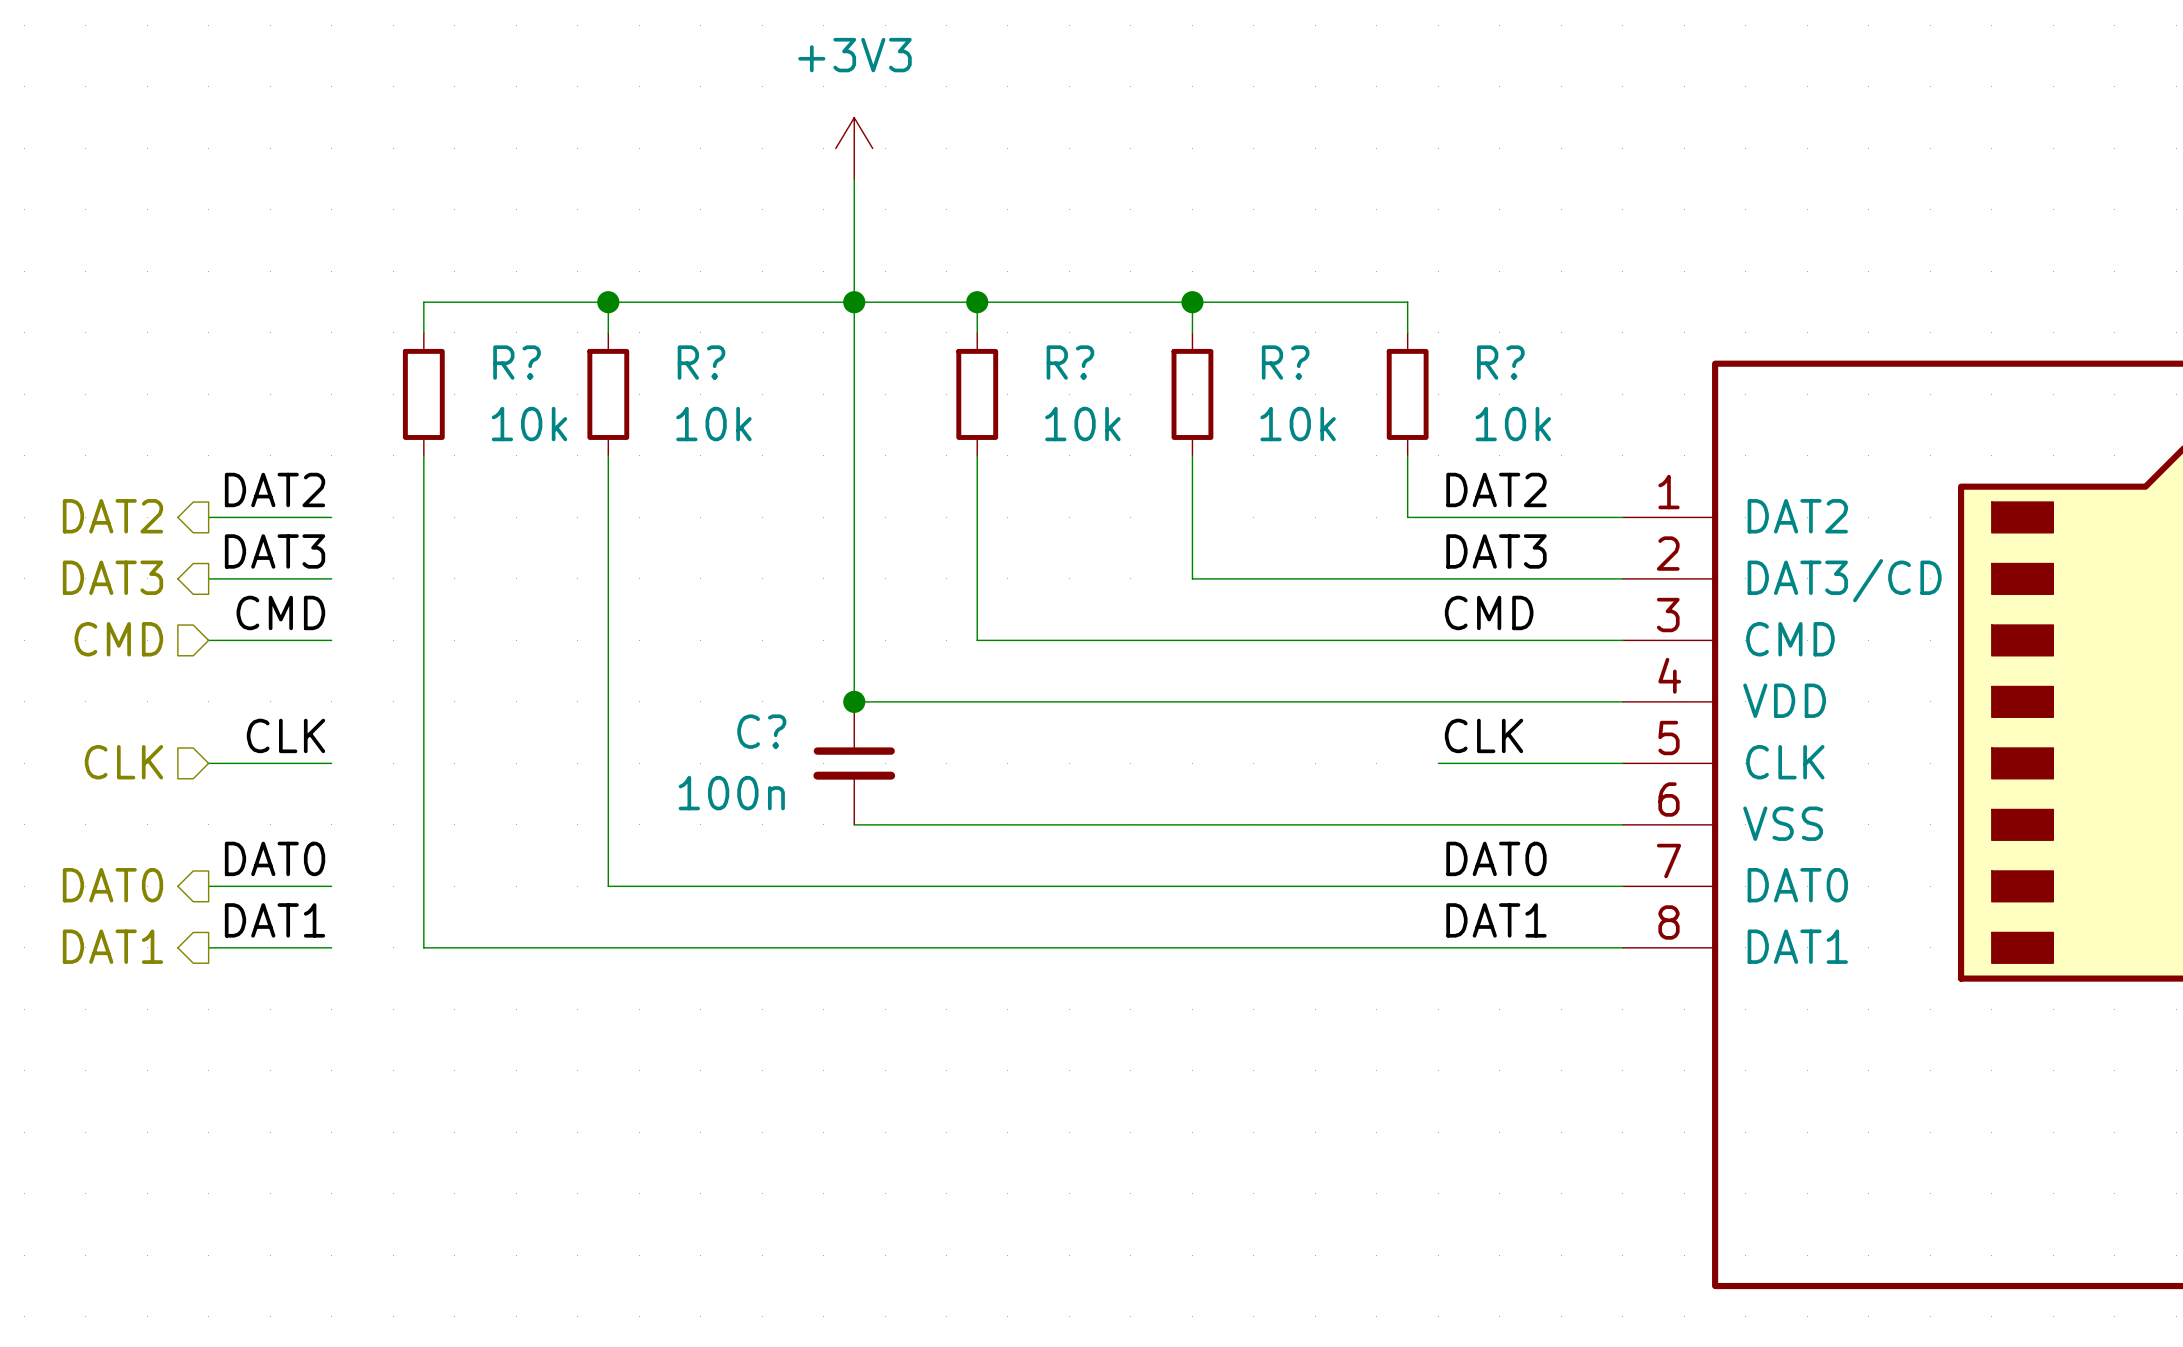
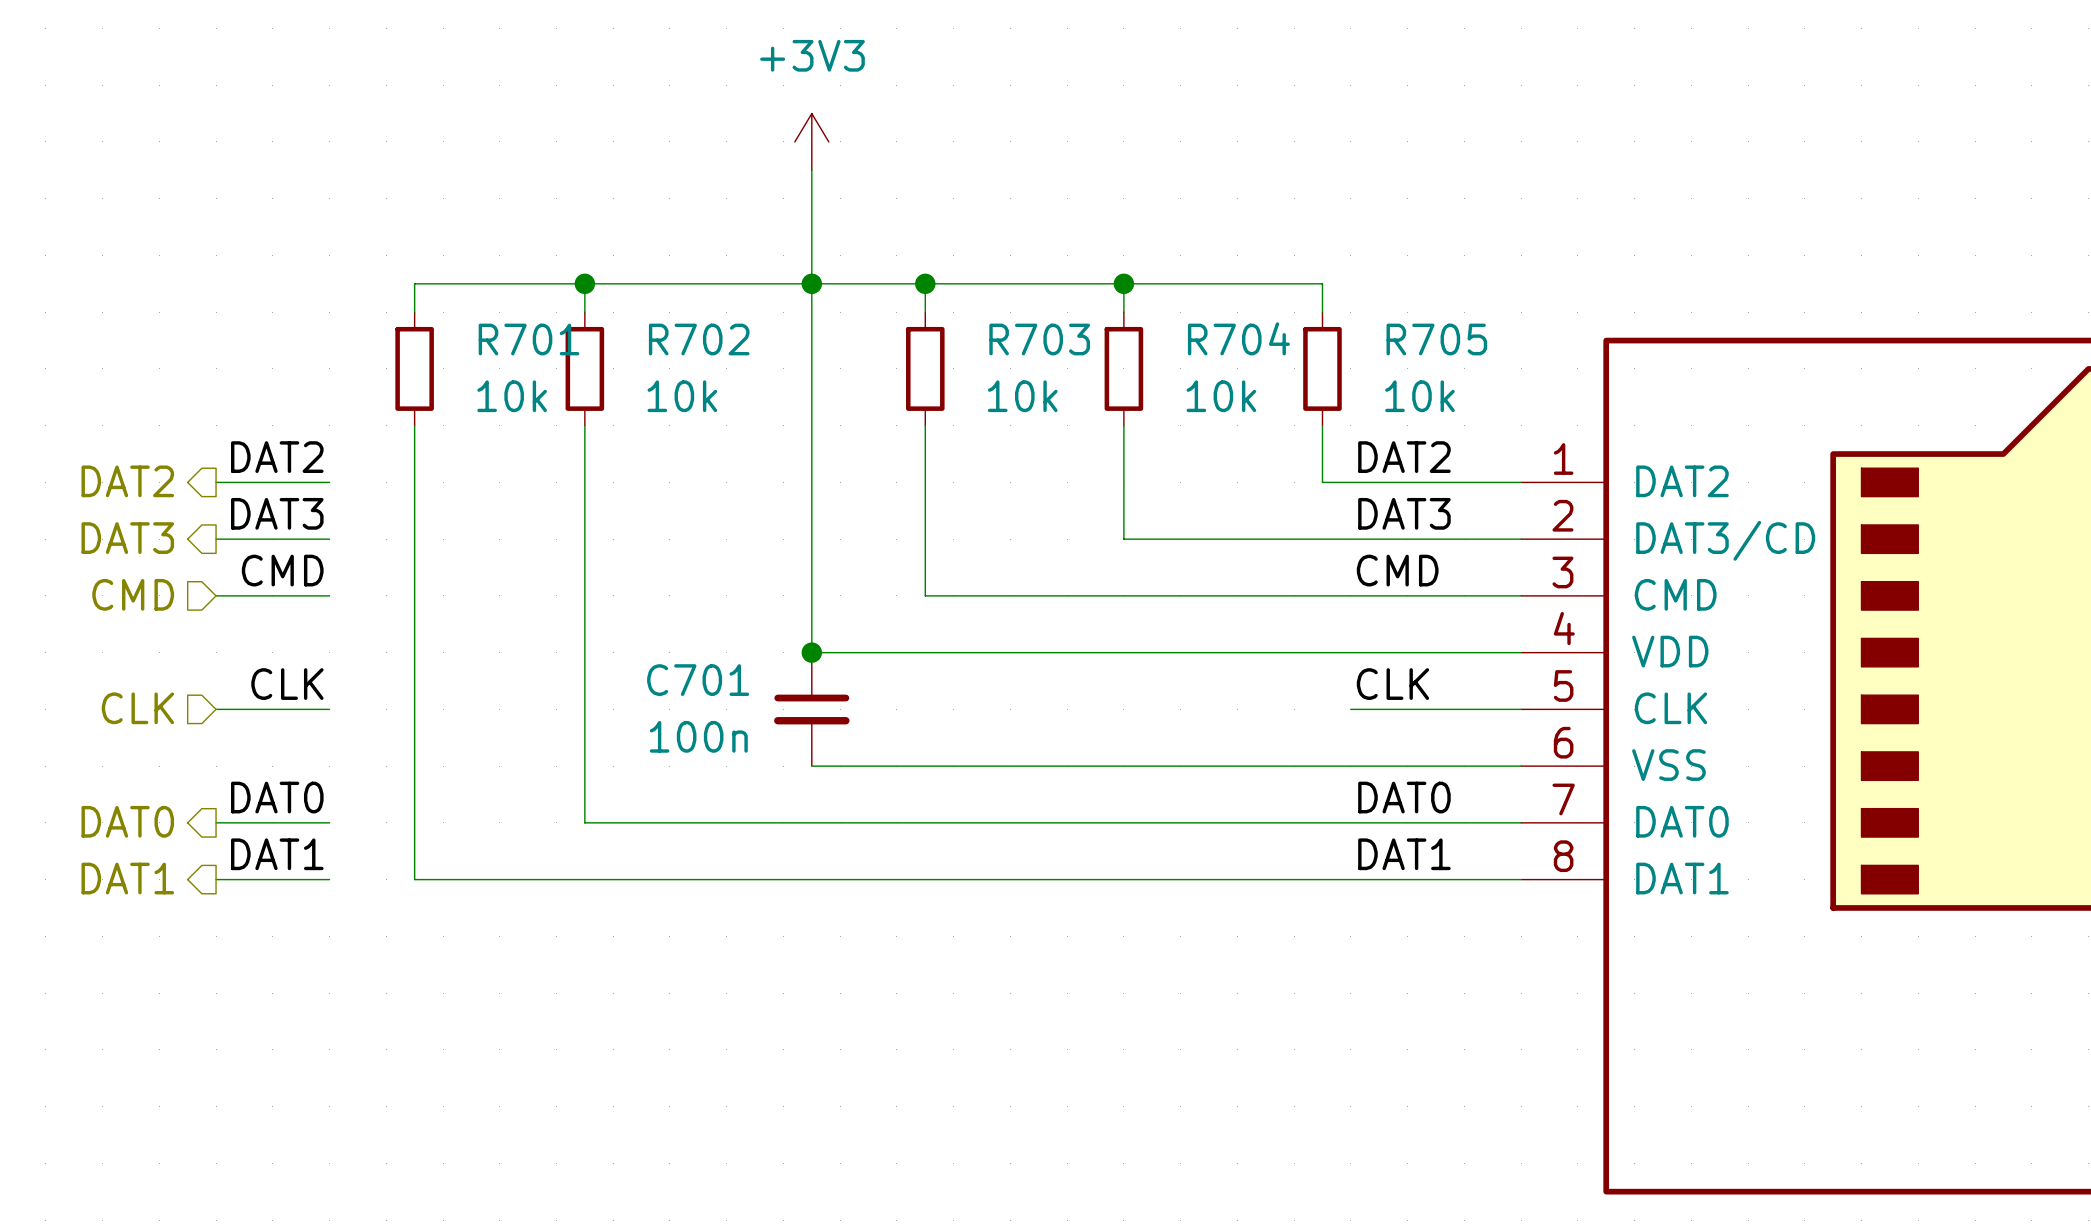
R? name: R? (517, 362) -> R701 (529, 339)
R? name: R? (701, 362) -> R702 (699, 339)
R? name: R? (1070, 362) -> R703 (1039, 339)
R? name: R? (1285, 362) -> R704 (1238, 338)
R? name: R? (1500, 362) -> R705 (1436, 339)
C? name: C? (761, 731) -> C701 (698, 680)

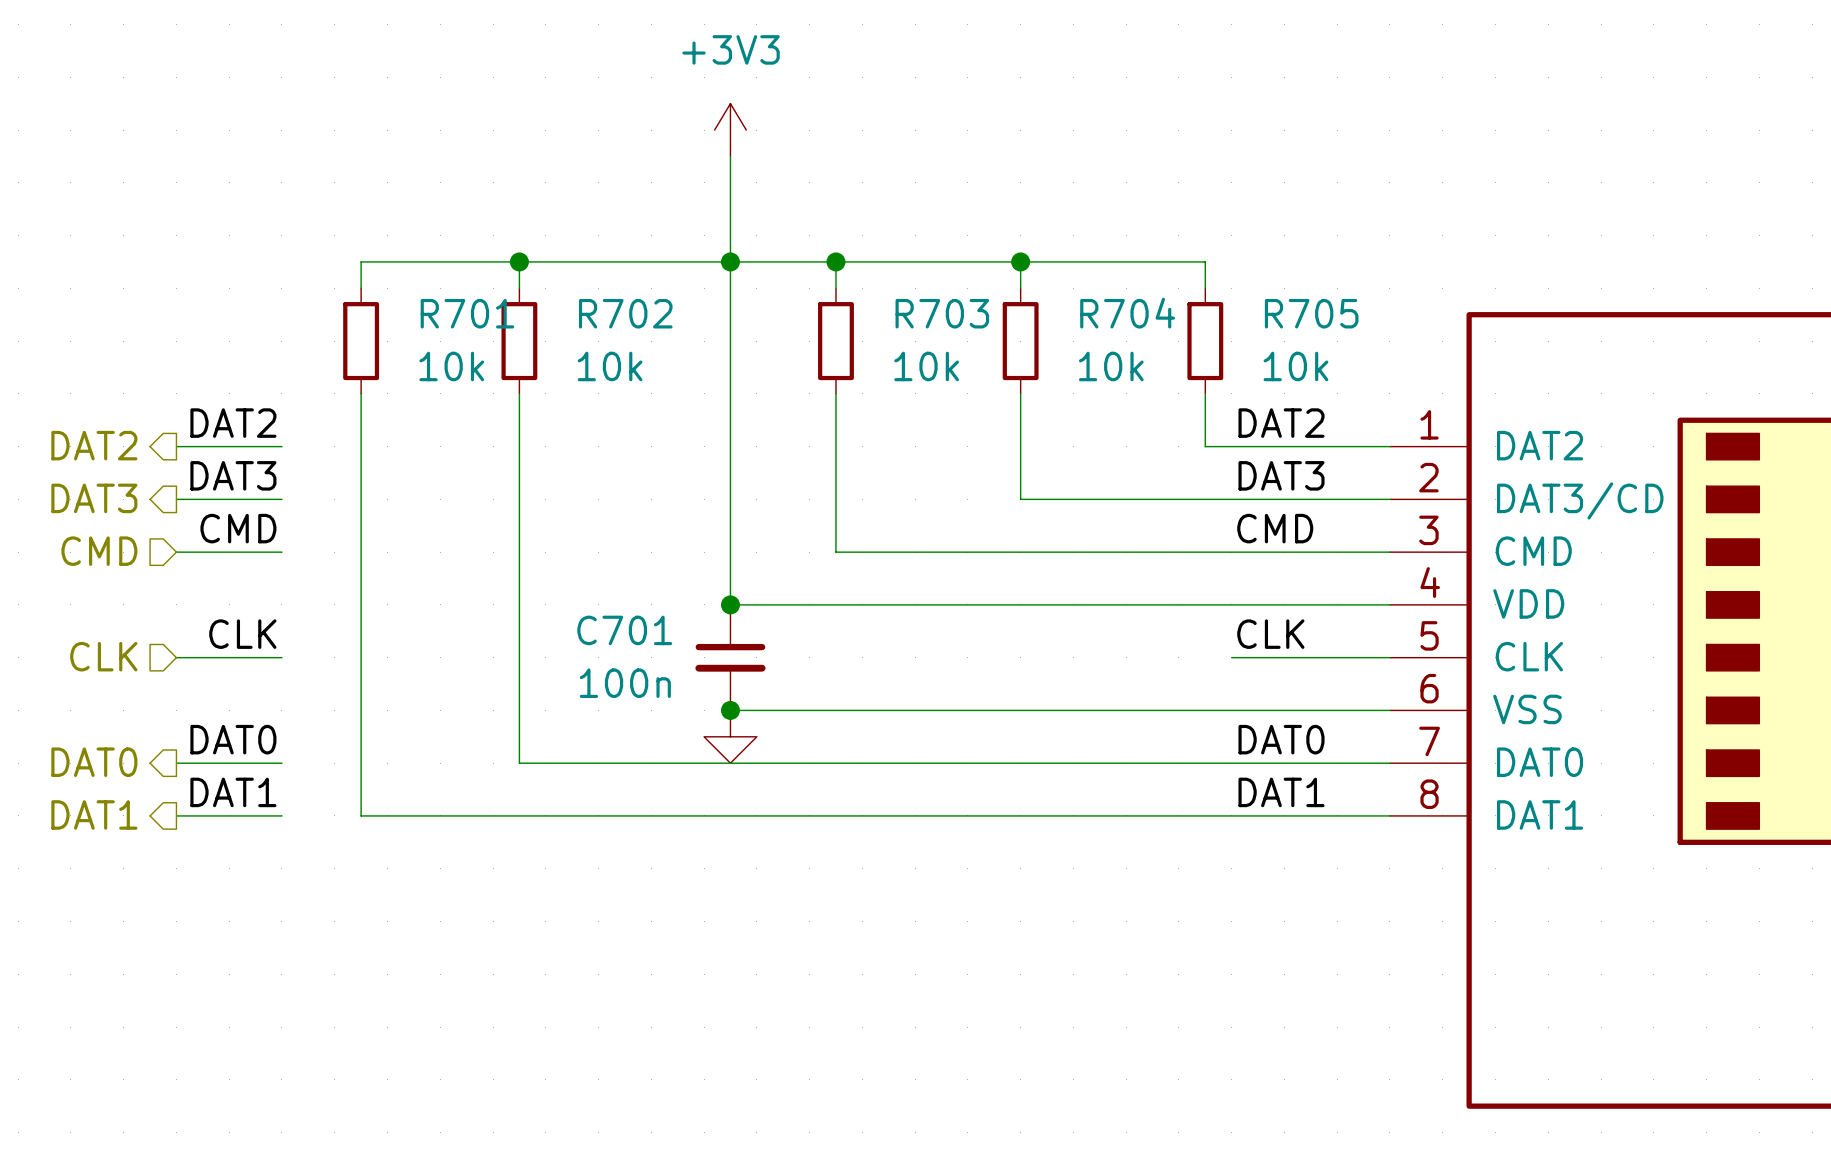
junction: none -> (730, 710)
power symbol: none -> (730, 736)

